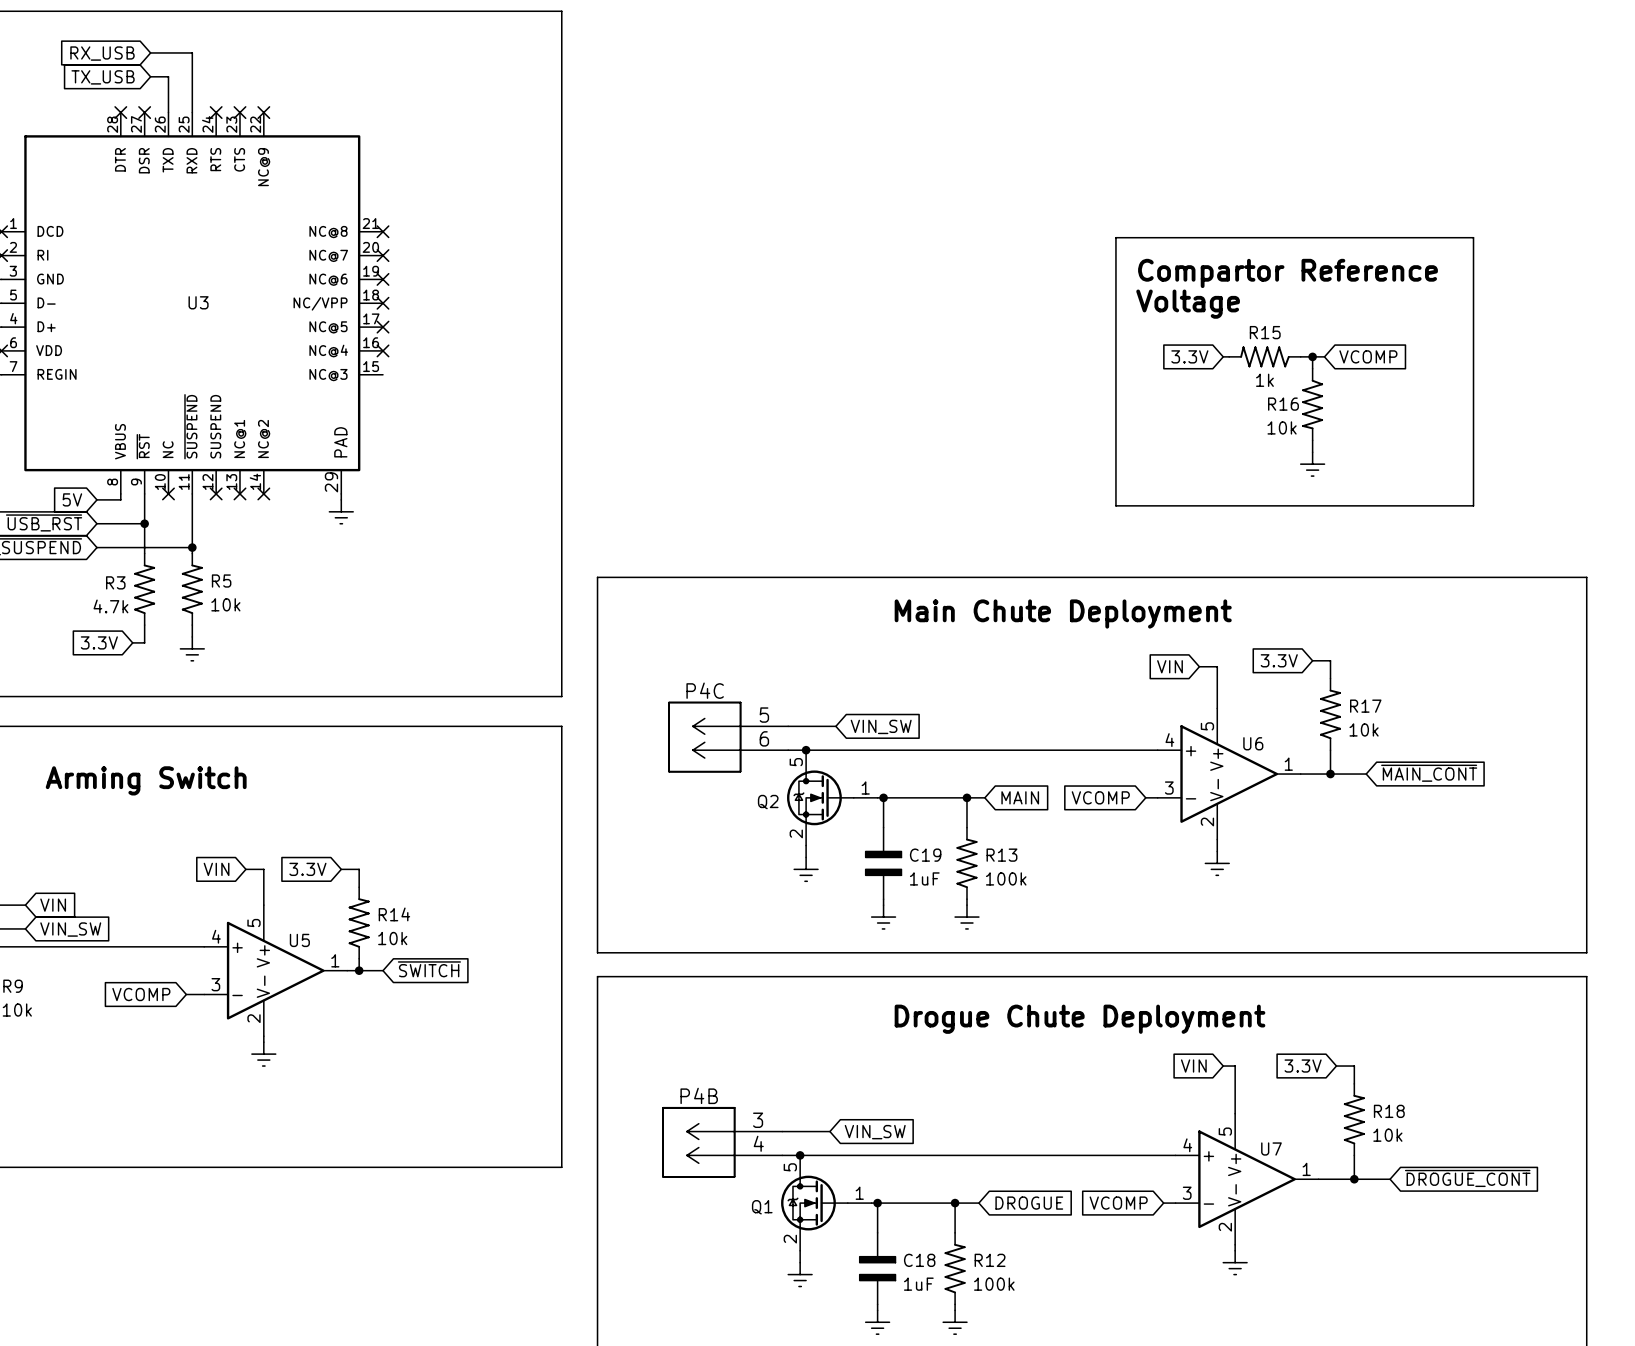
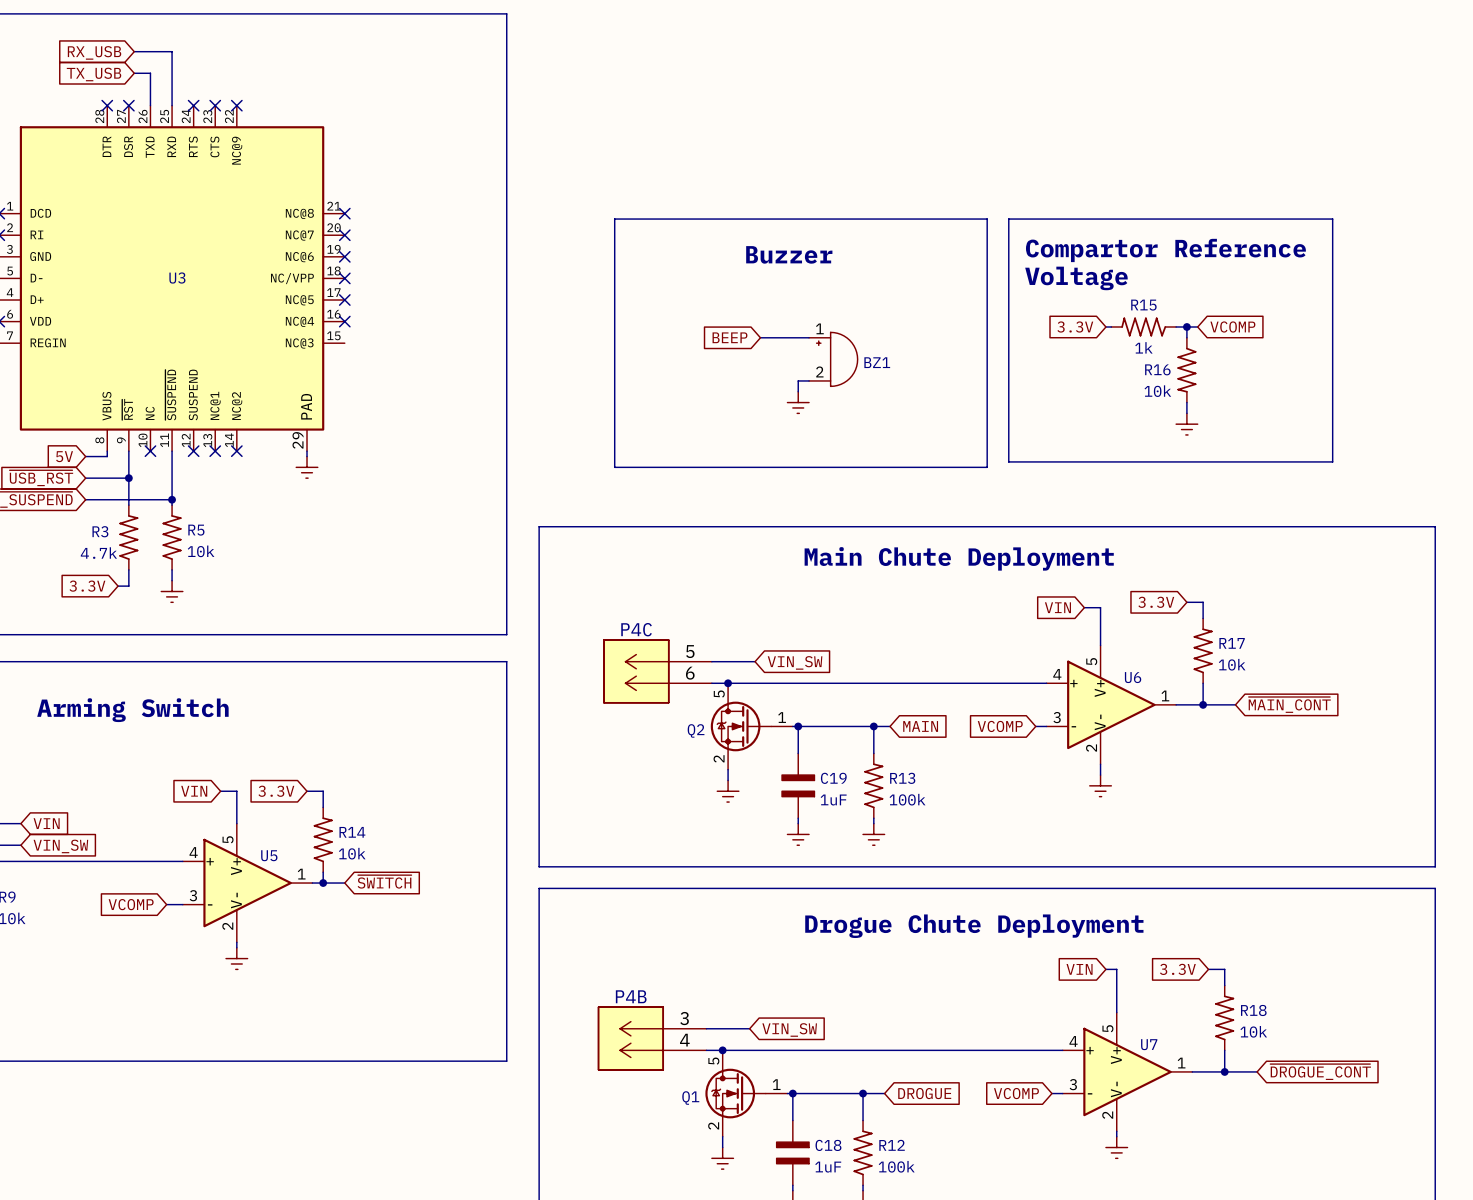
line: none -> (614, 219) (987, 219) (987, 467) (614, 467) (614, 219)
text: none -> Buzzer (789, 254)
global label: none -> BEEP (729, 337)
wire: none -> (760, 337) (809, 337)
BZ1: none -> (833, 359)
wire: none -> (809, 380) (798, 380) (798, 391)
power symbol: none -> (798, 402)

